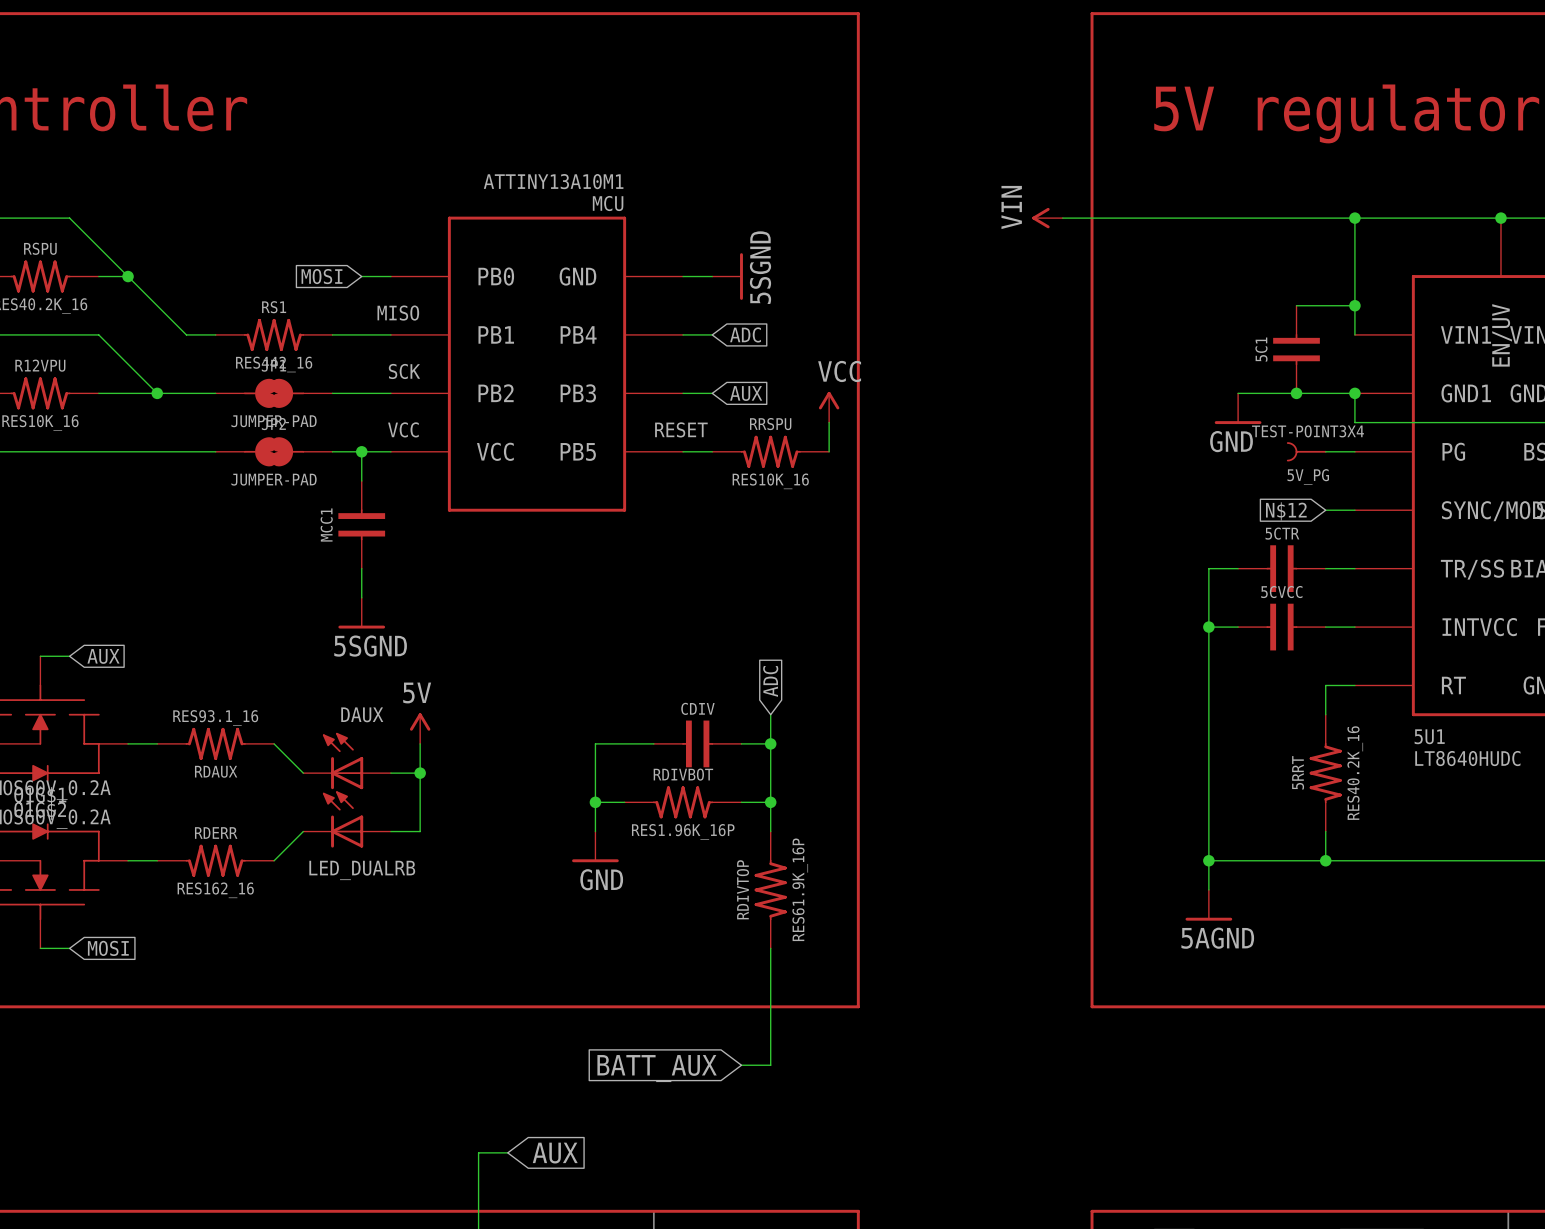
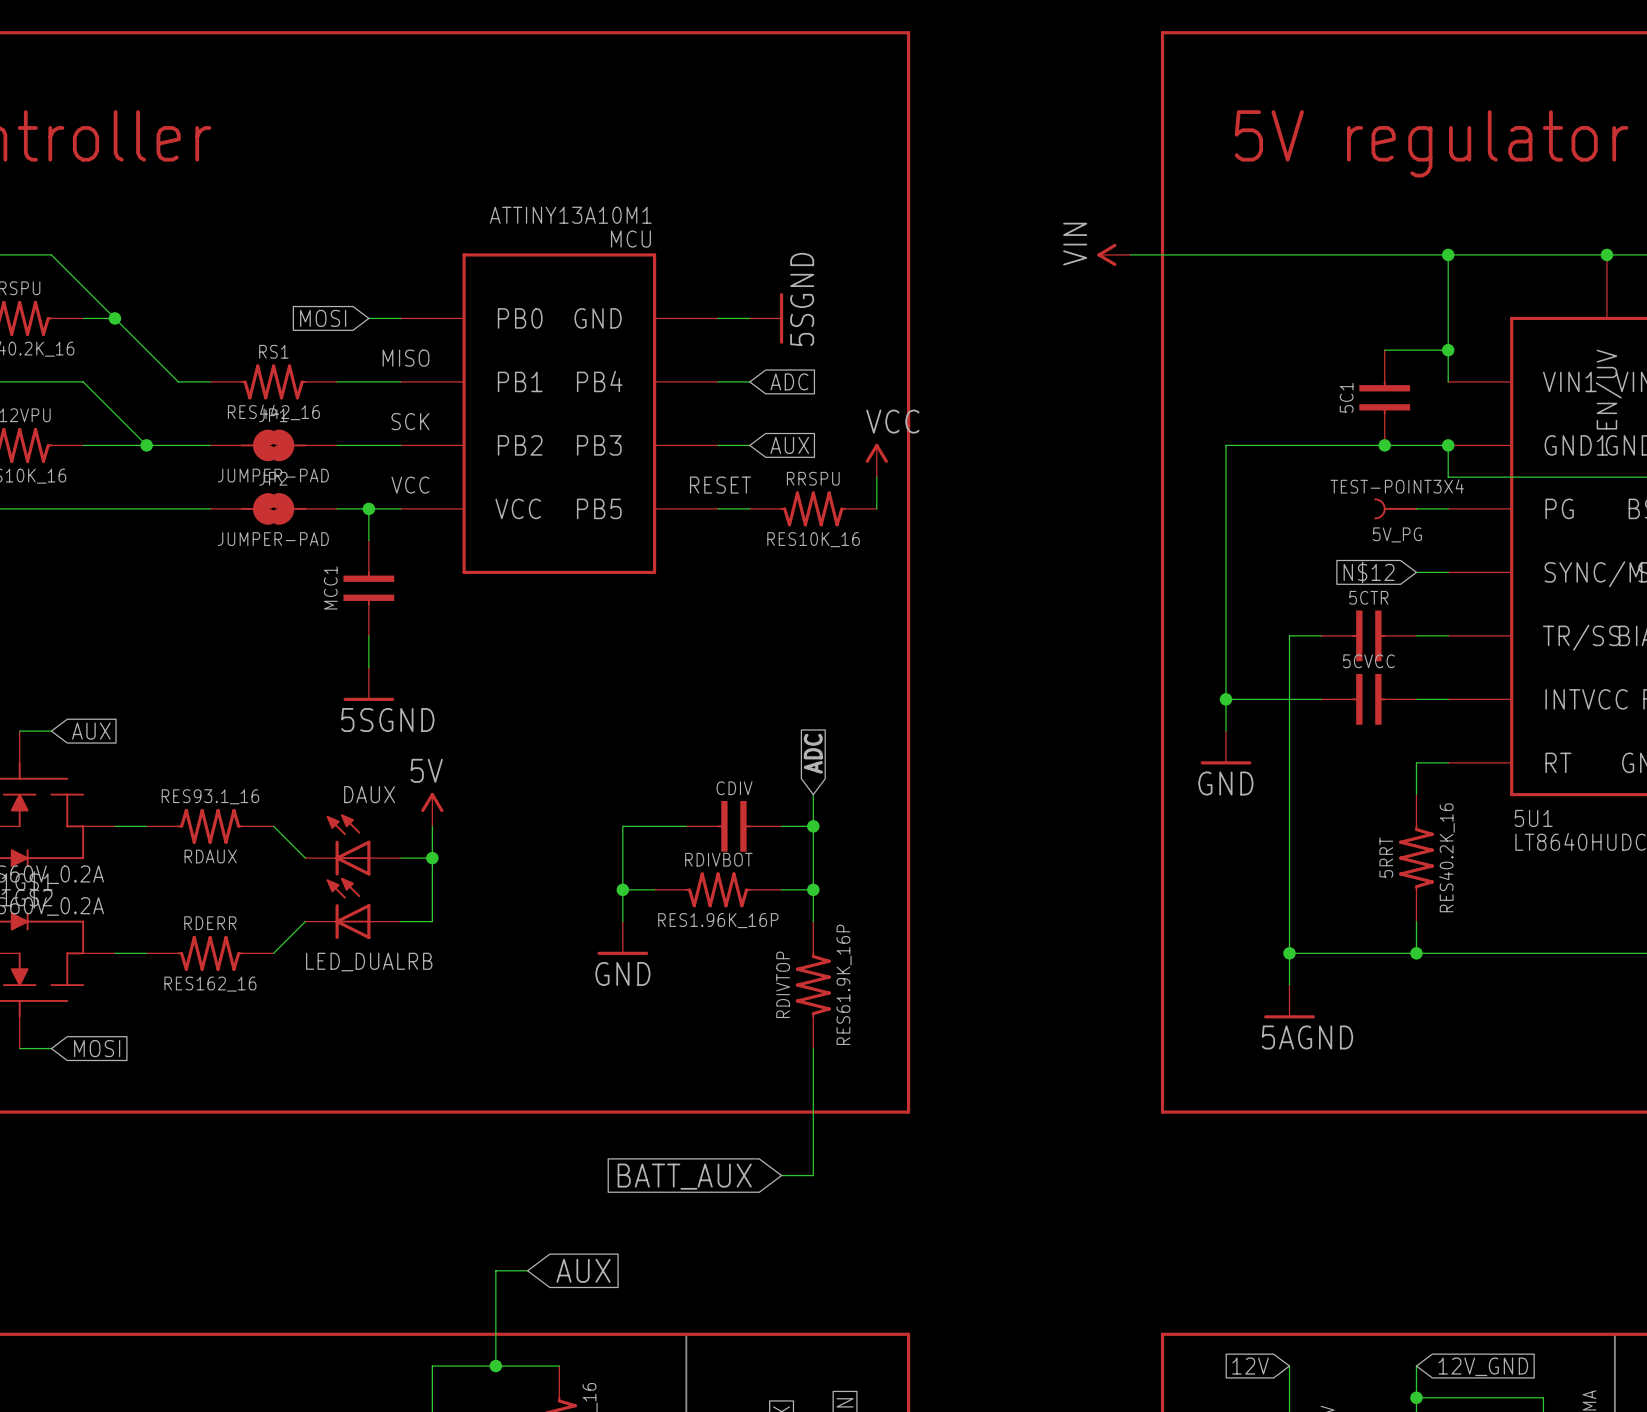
wire: none -> (1321, 445) (1226, 445) (1226, 731)
power symbol position: GND (1238, 408) -> GND (1226, 747)
wire: none -> (1226, 699) (1289, 699)
junction position: (1208, 627) -> (1226, 699)

